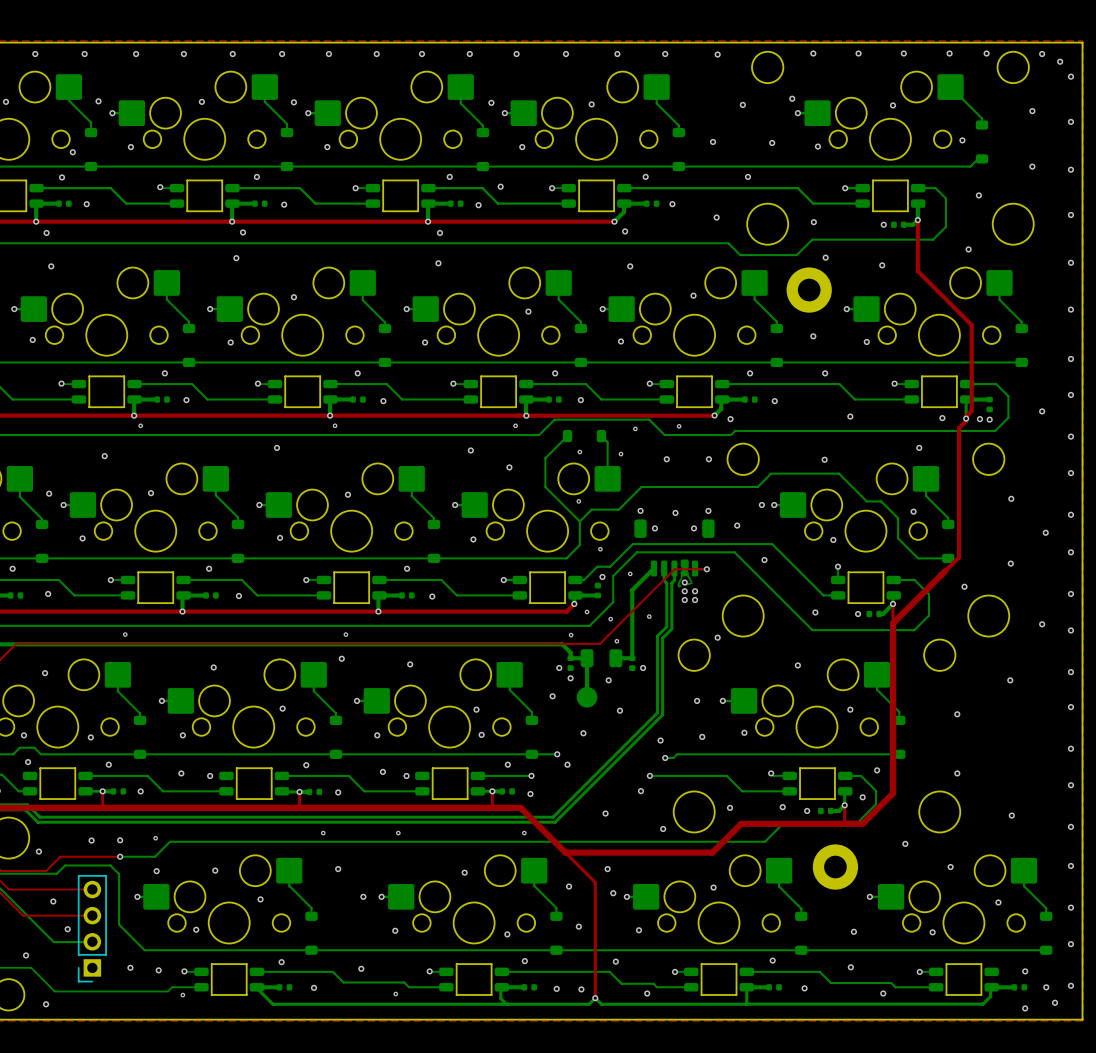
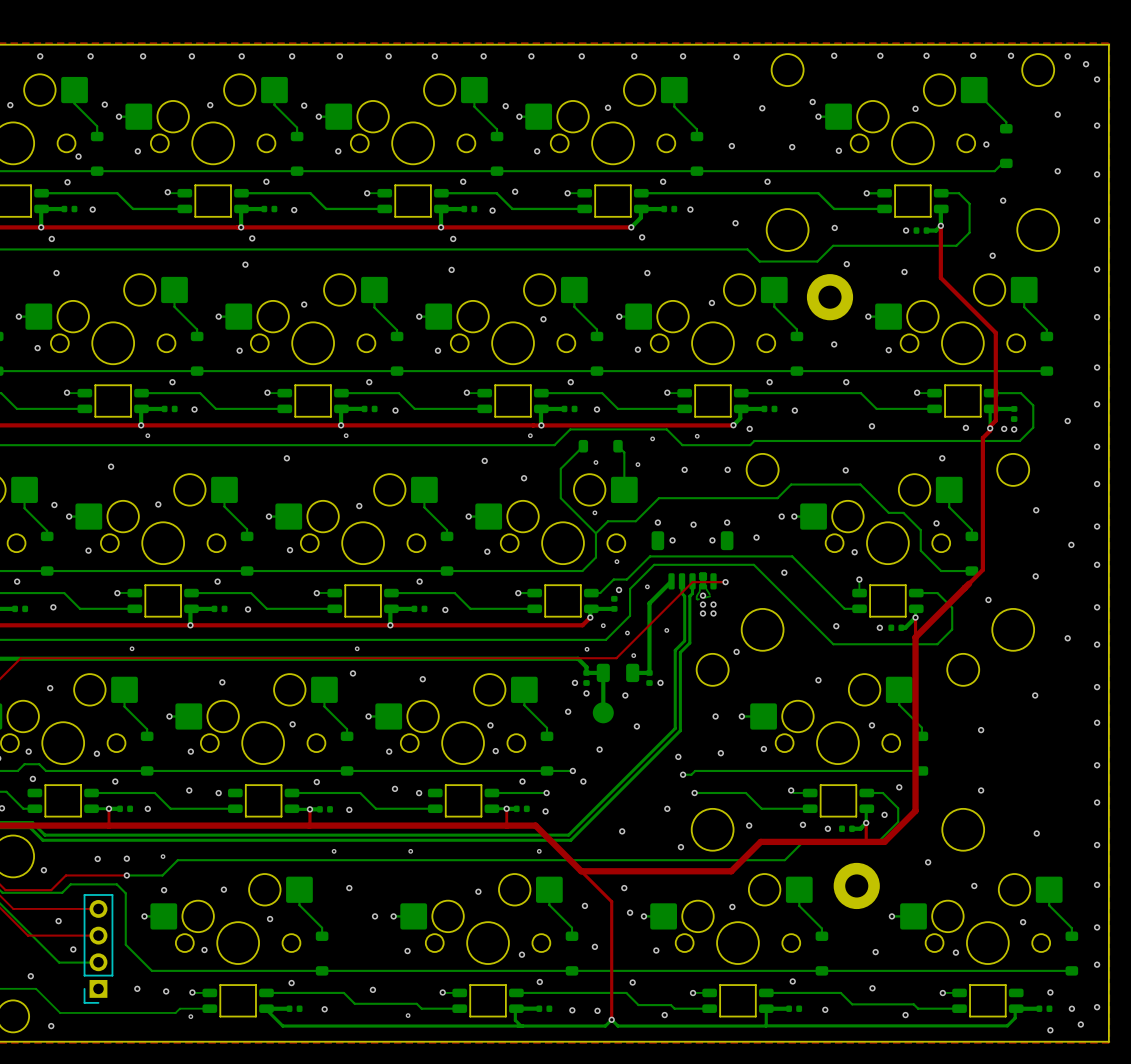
bottom track: (649, 775) (676, 775) -> none
via: (649, 775) -> none
via: none -> (694, 792)
via: (640, 791) -> none
via: none -> (667, 808)

